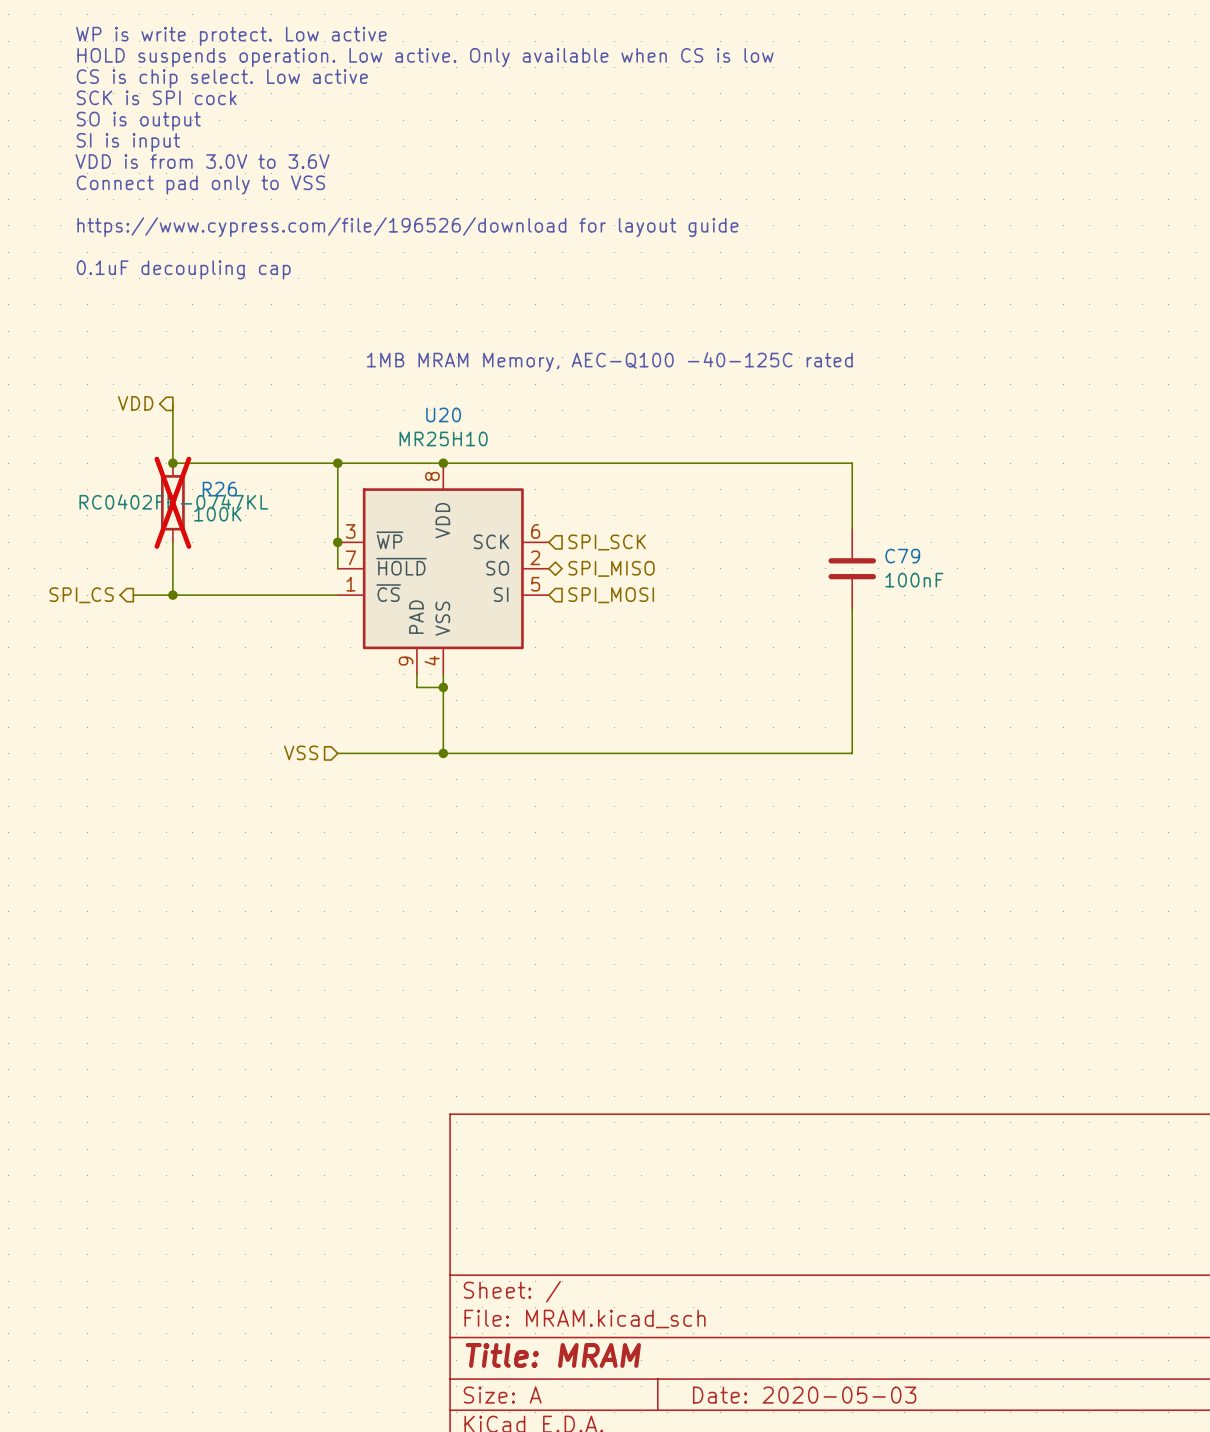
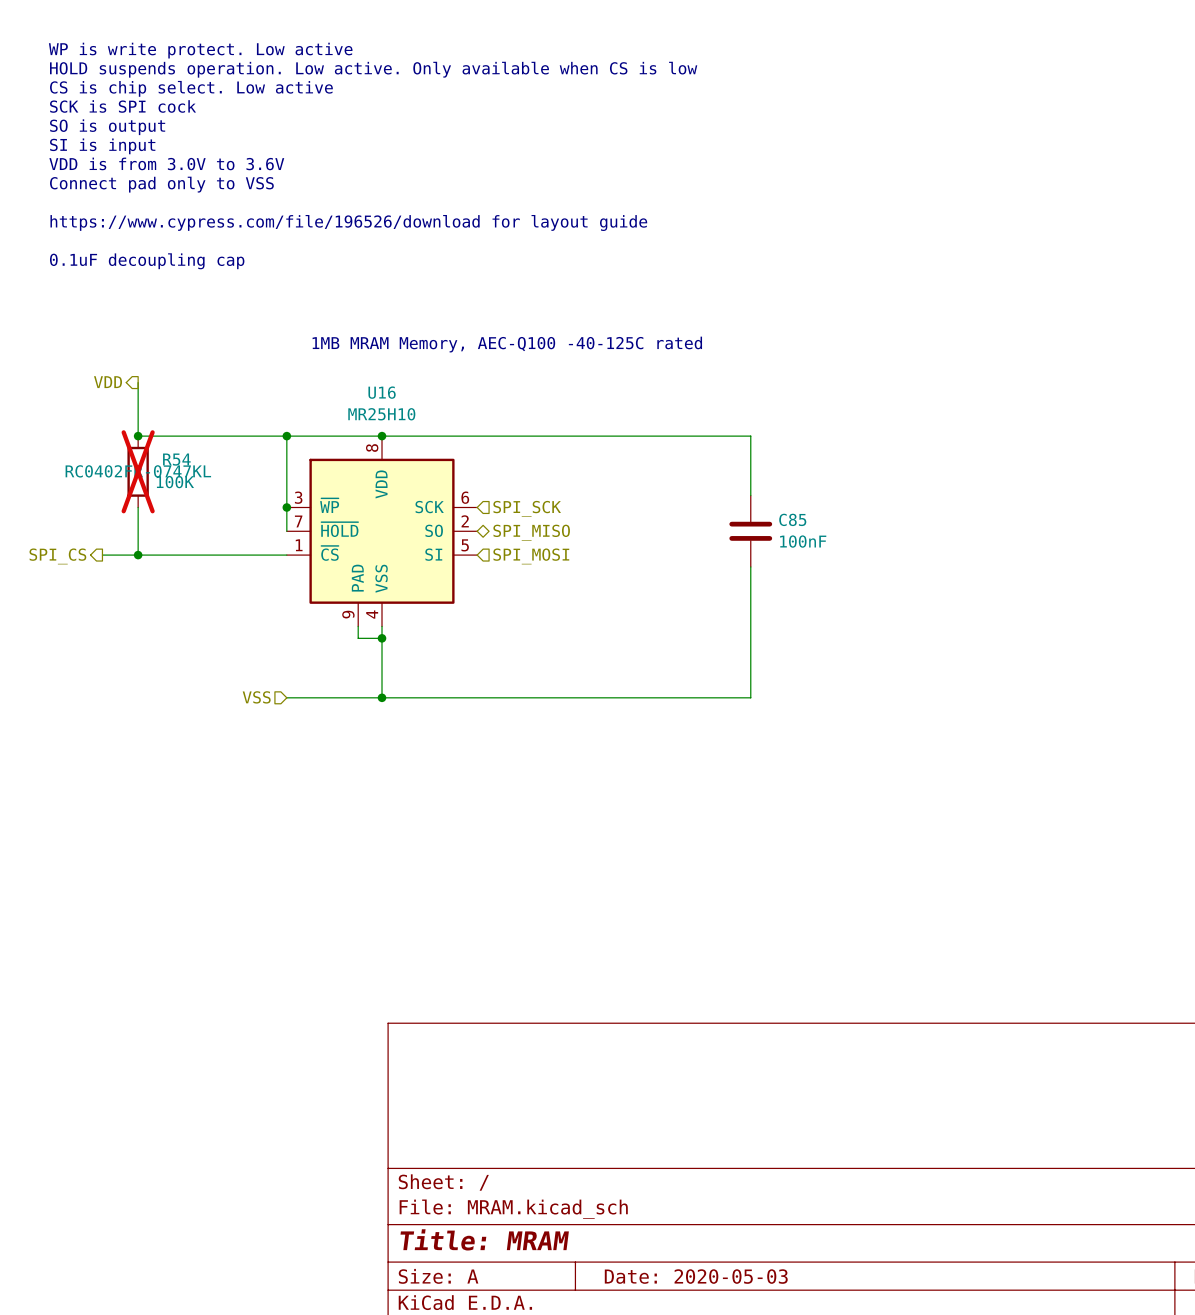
U20 name: U20 (443, 414) -> U16 (382, 392)
R26 name: R26 (219, 489) -> R54 (176, 459)
C79 name: C79 (902, 556) -> C85 (792, 519)

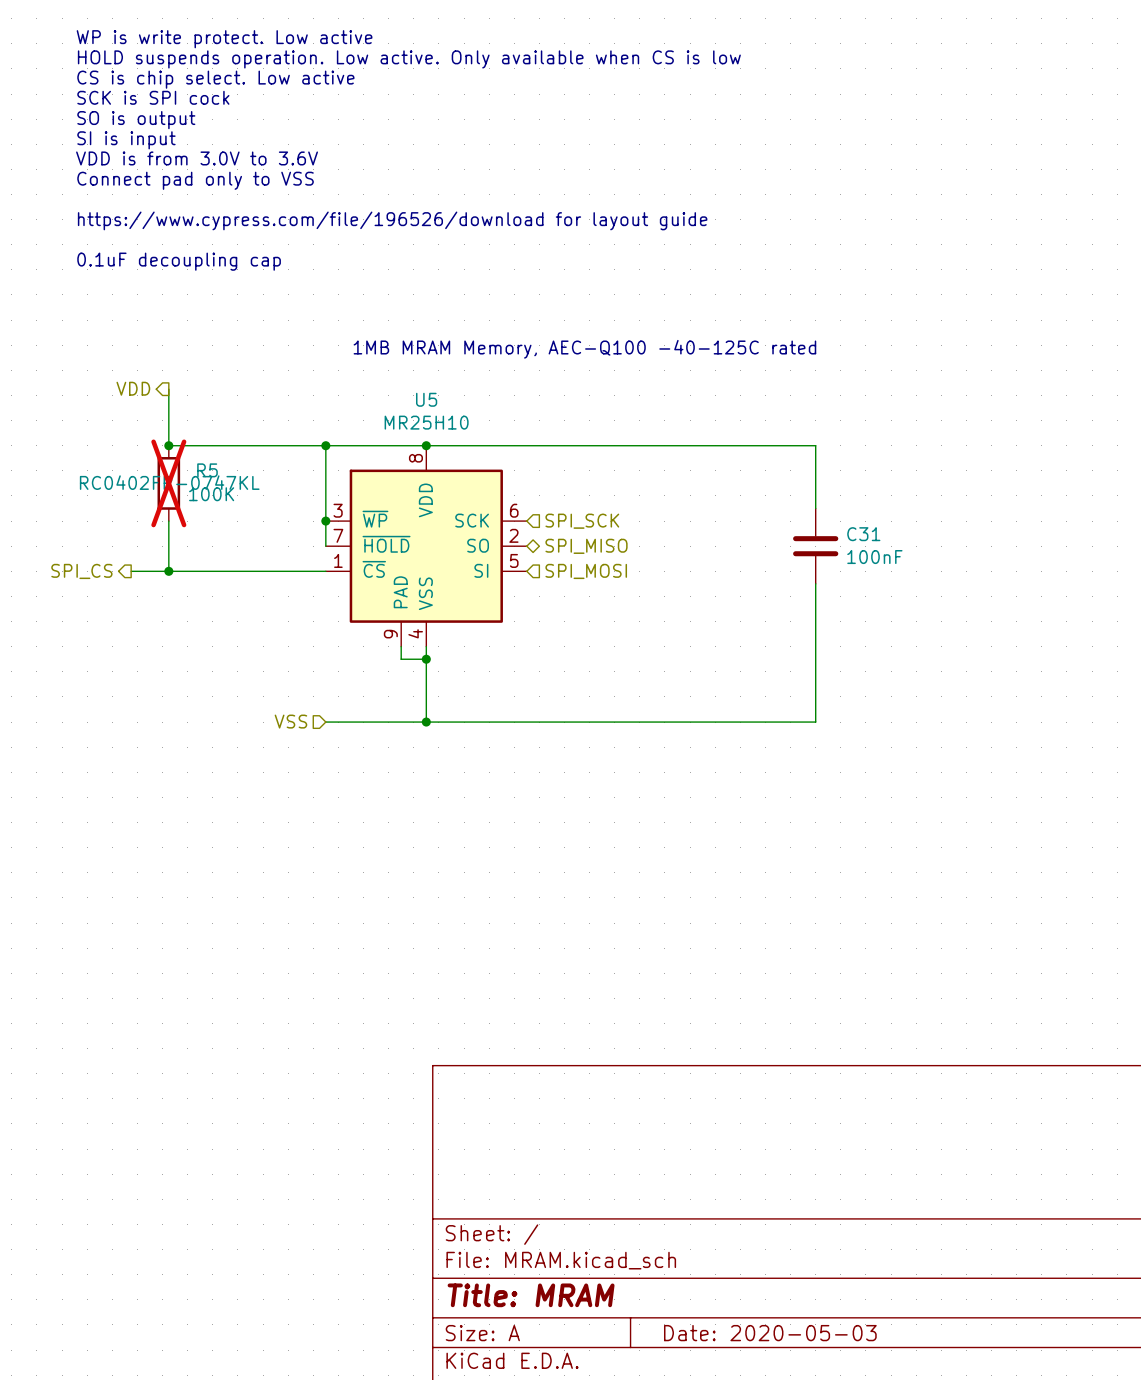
U16 name: U16 (382, 392) -> U5 (426, 399)
R54 name: R54 (176, 459) -> R5 (207, 470)
C85 name: C85 (792, 519) -> C31 (863, 534)

